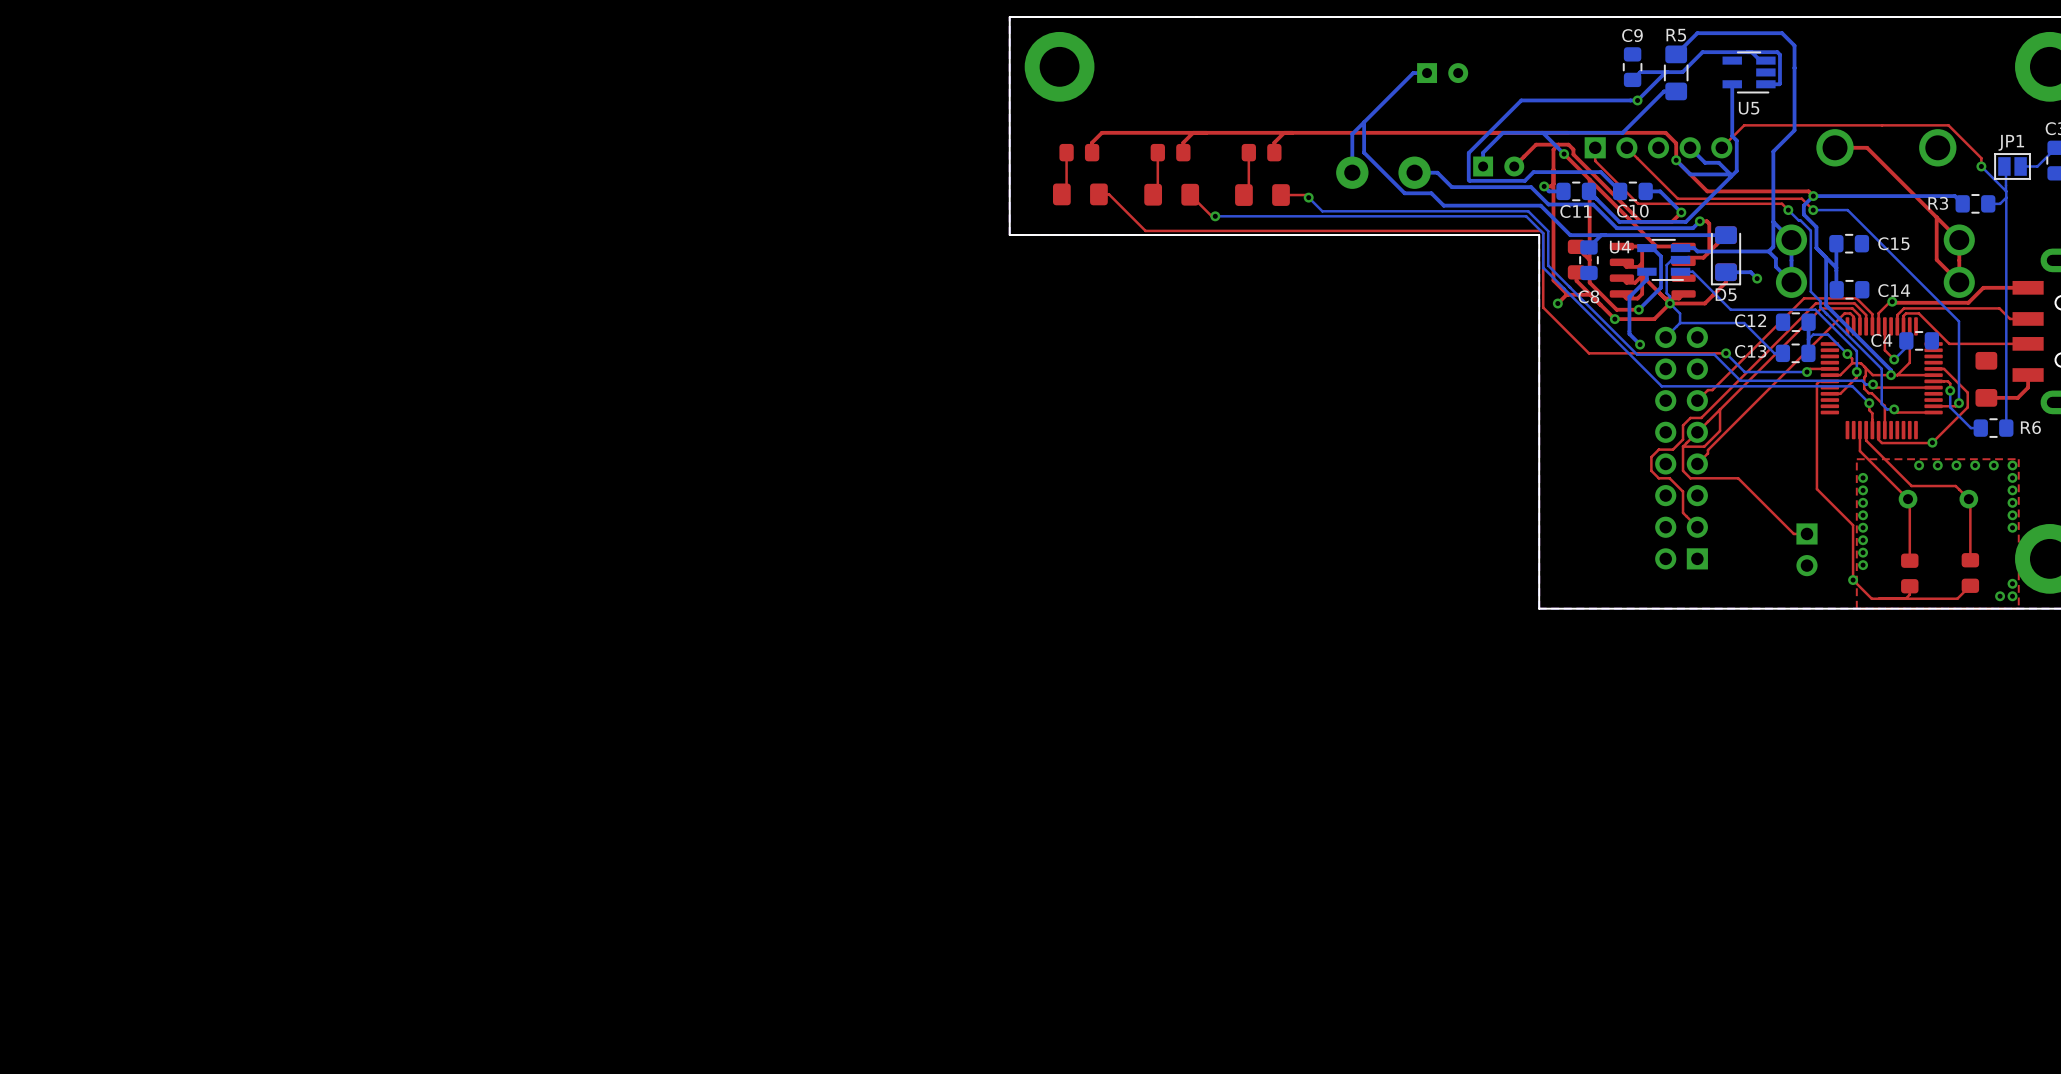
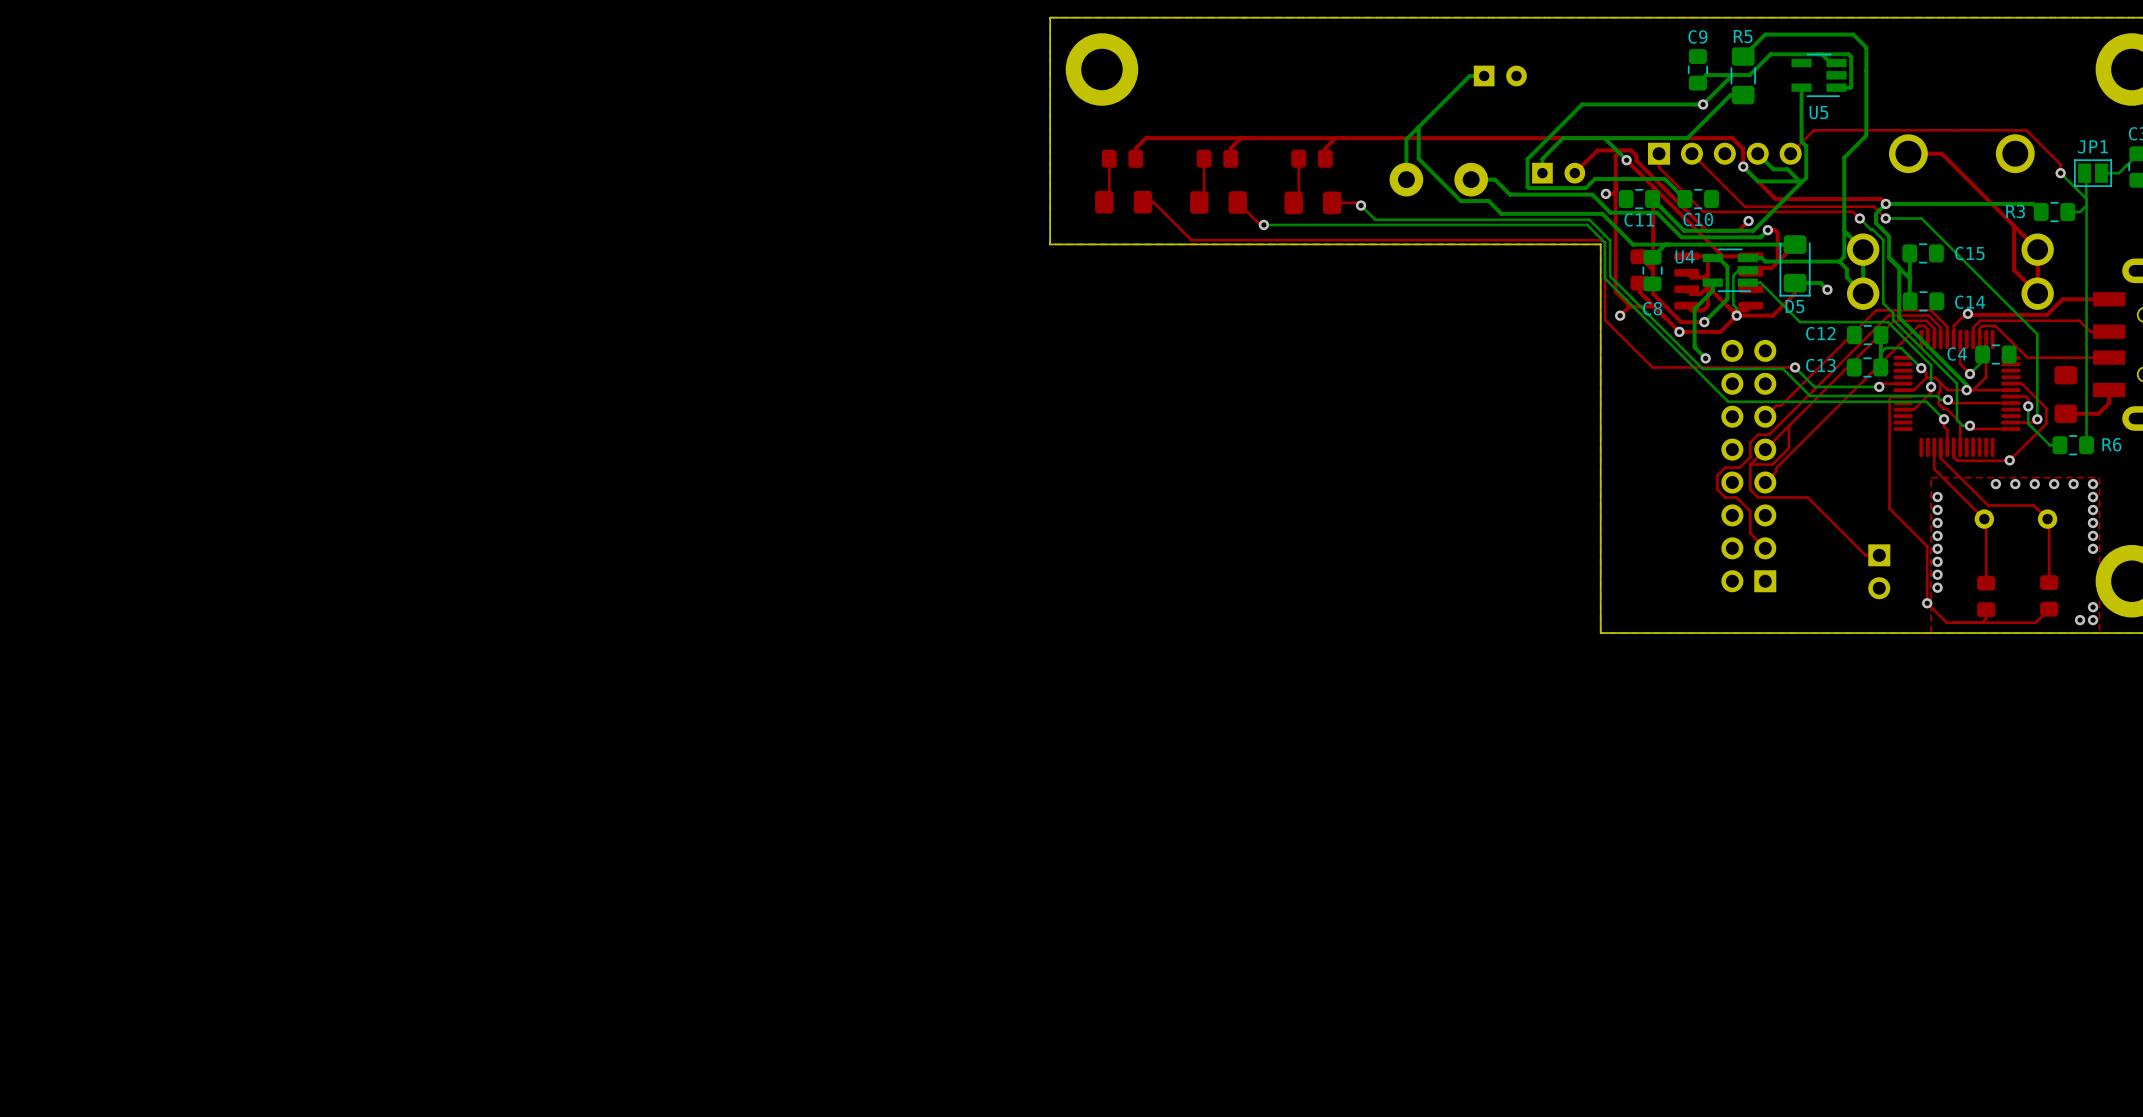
bottom track: (1544, 186) (1549, 191) (1563, 191) -> none
bottom track: (1645, 191) (1660, 191) (1681, 212) -> none
bottom track: (1669, 303) (1680, 313) (1680, 323) -> none
bottom track: (1680, 323) (1665, 337) -> none
bottom track: (1680, 323) (1744, 323) (1774, 353) (1782, 353) -> none

